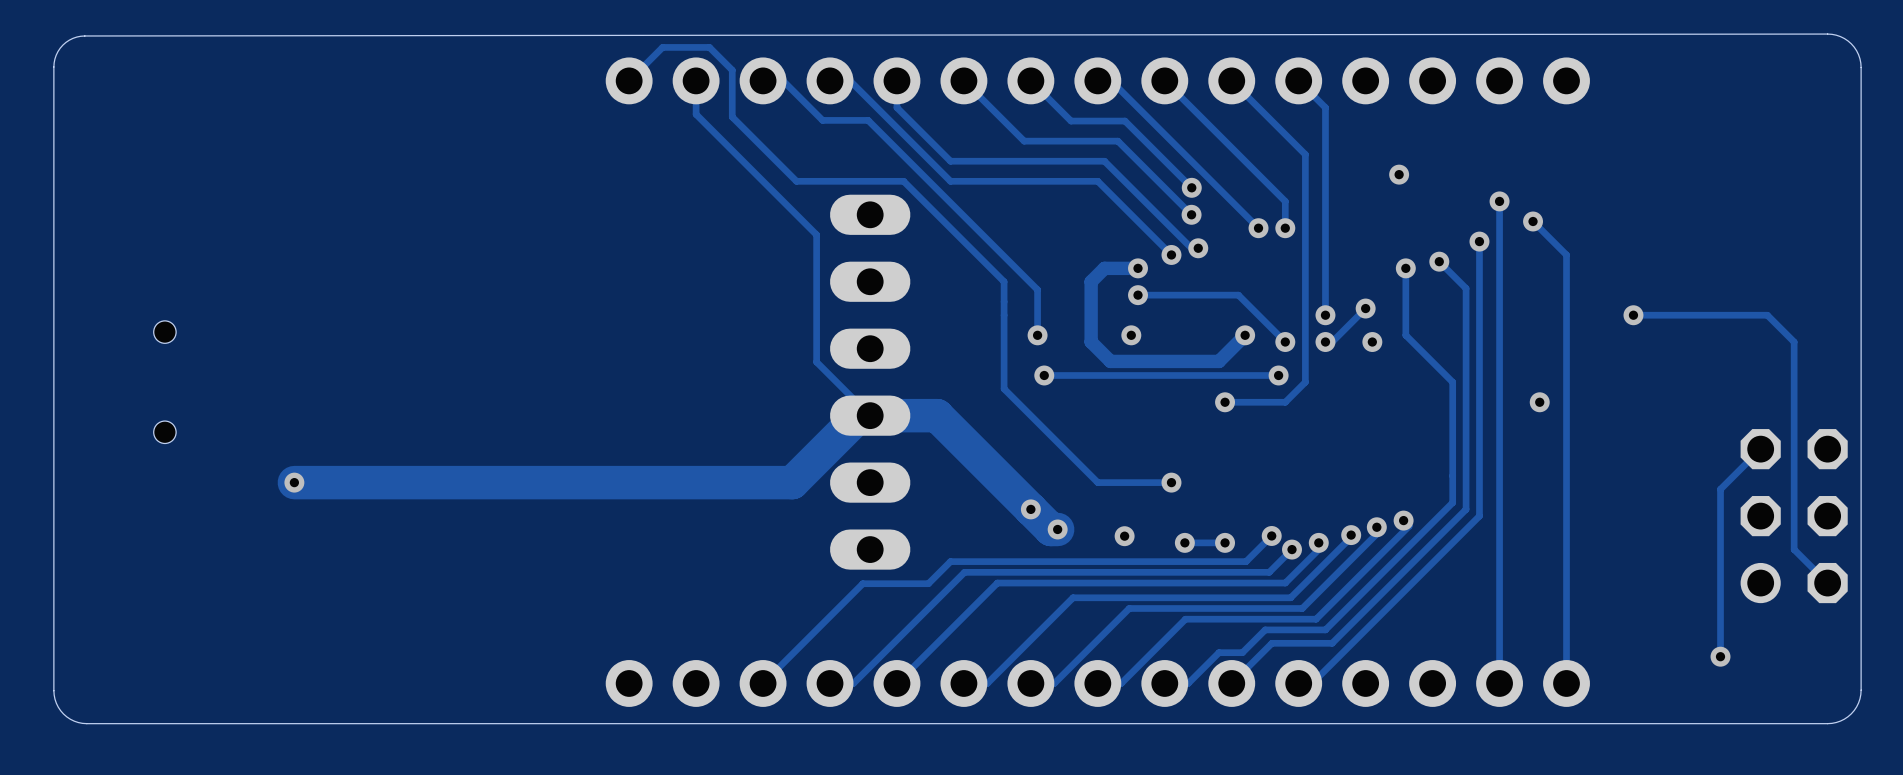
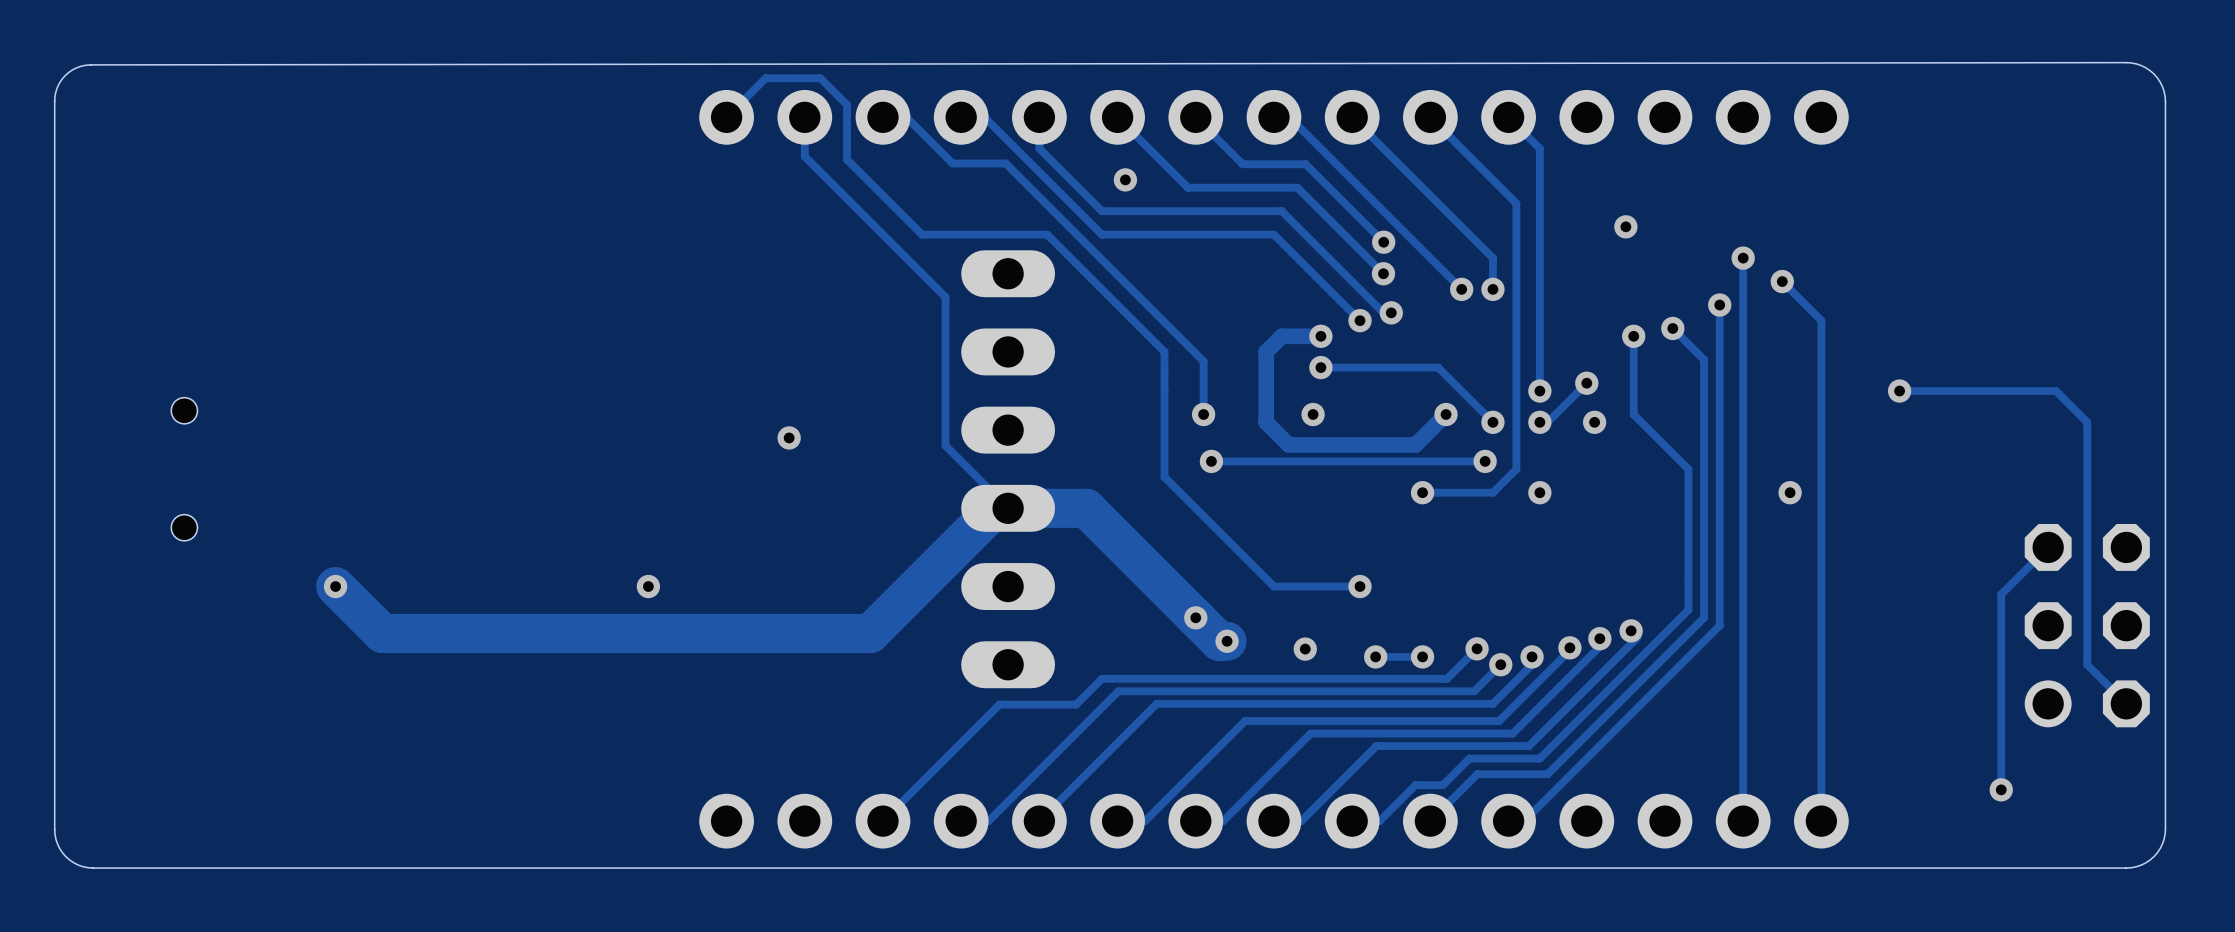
via: none -> (1125, 179)
via: none -> (789, 437)
via: none -> (1539, 492)
via: none -> (648, 586)
track: (792, 482) (294, 482) -> (917, 586) (870, 633) (382, 633) (335, 586)

